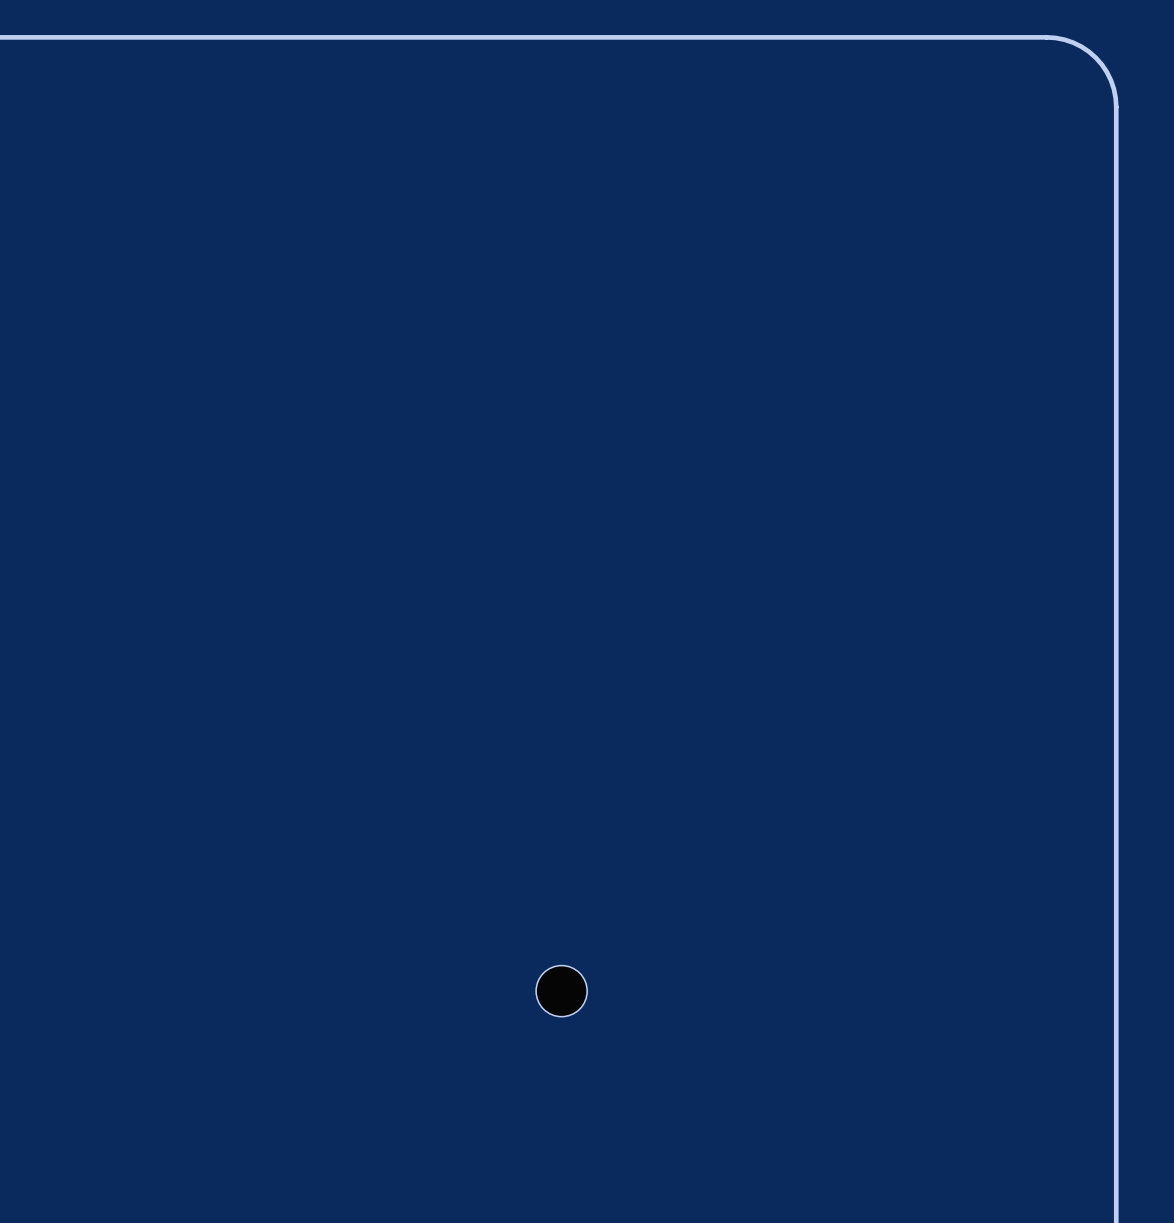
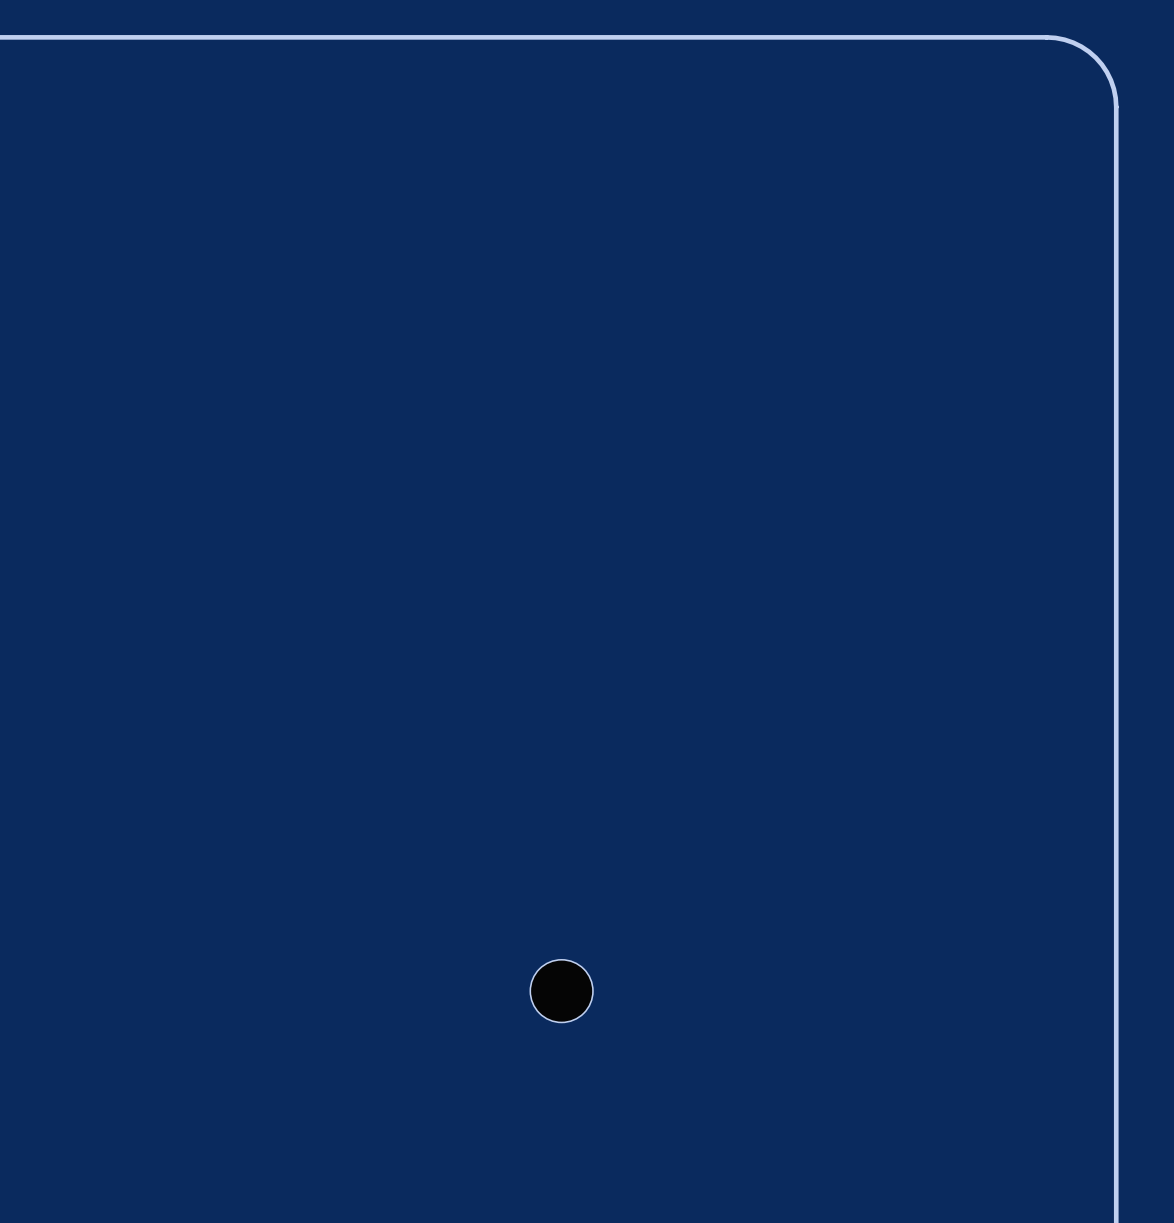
part footprint: [536, 965, 588, 1017] -> [530, 959, 593, 1023]

